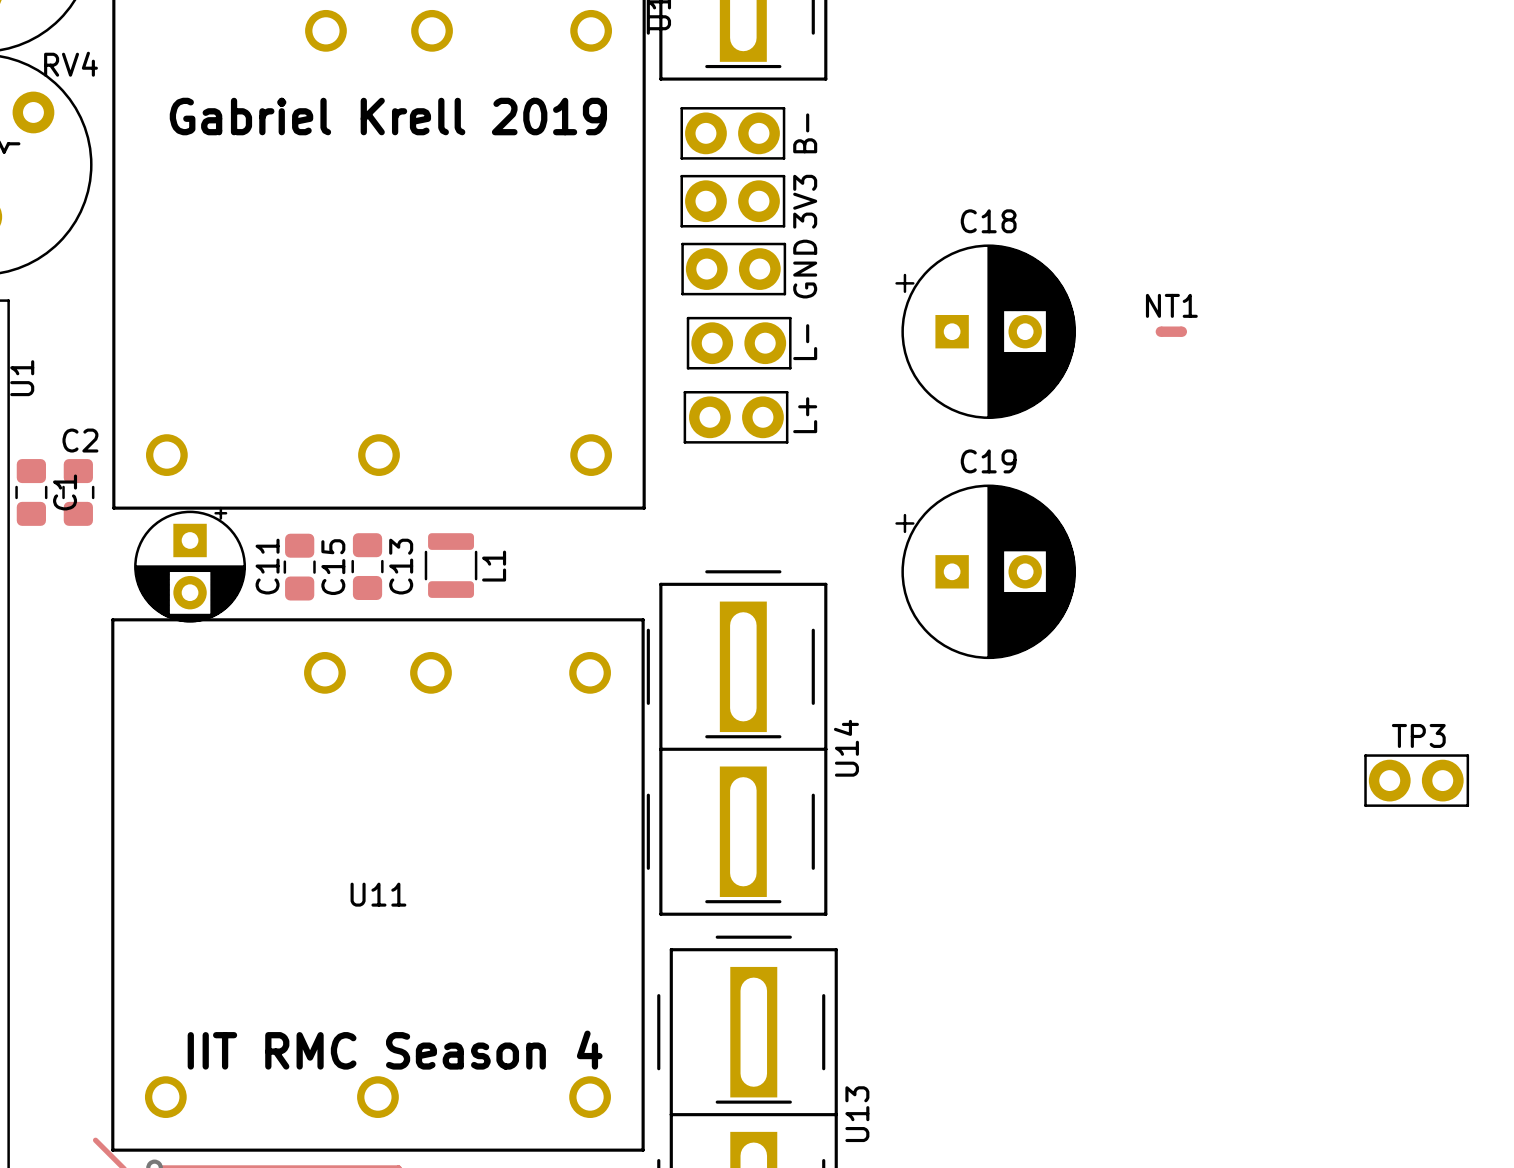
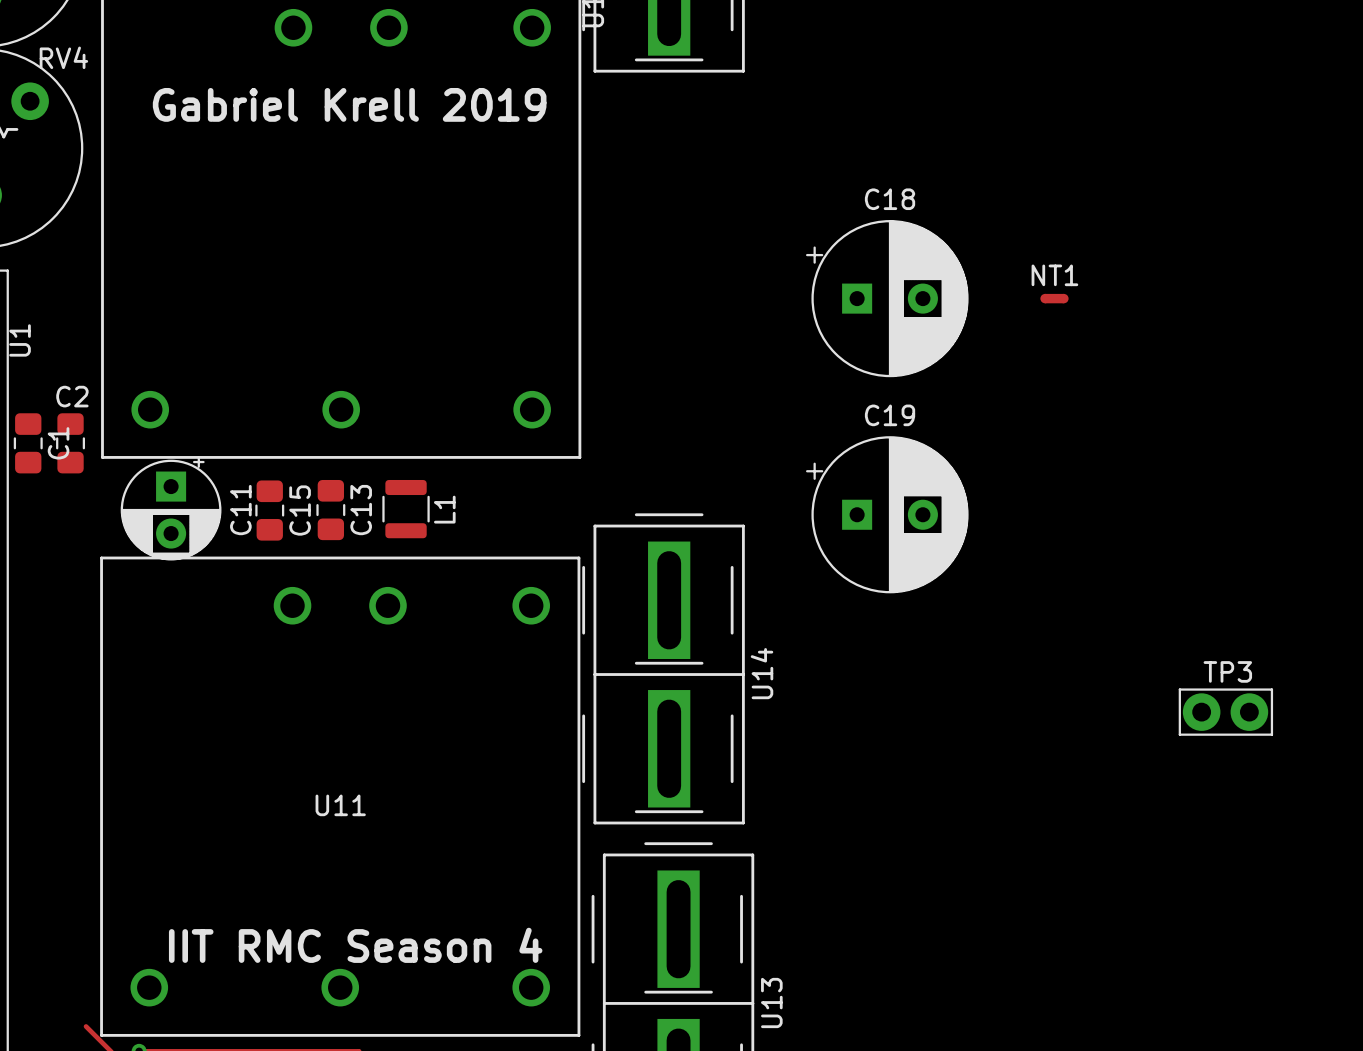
part: (732, 133) -> none
part: (732, 201) -> none
part: (733, 269) -> none
part: (739, 343) -> none
part: (736, 417) -> none
TP3 position: (1416, 780) -> (1225, 712)

